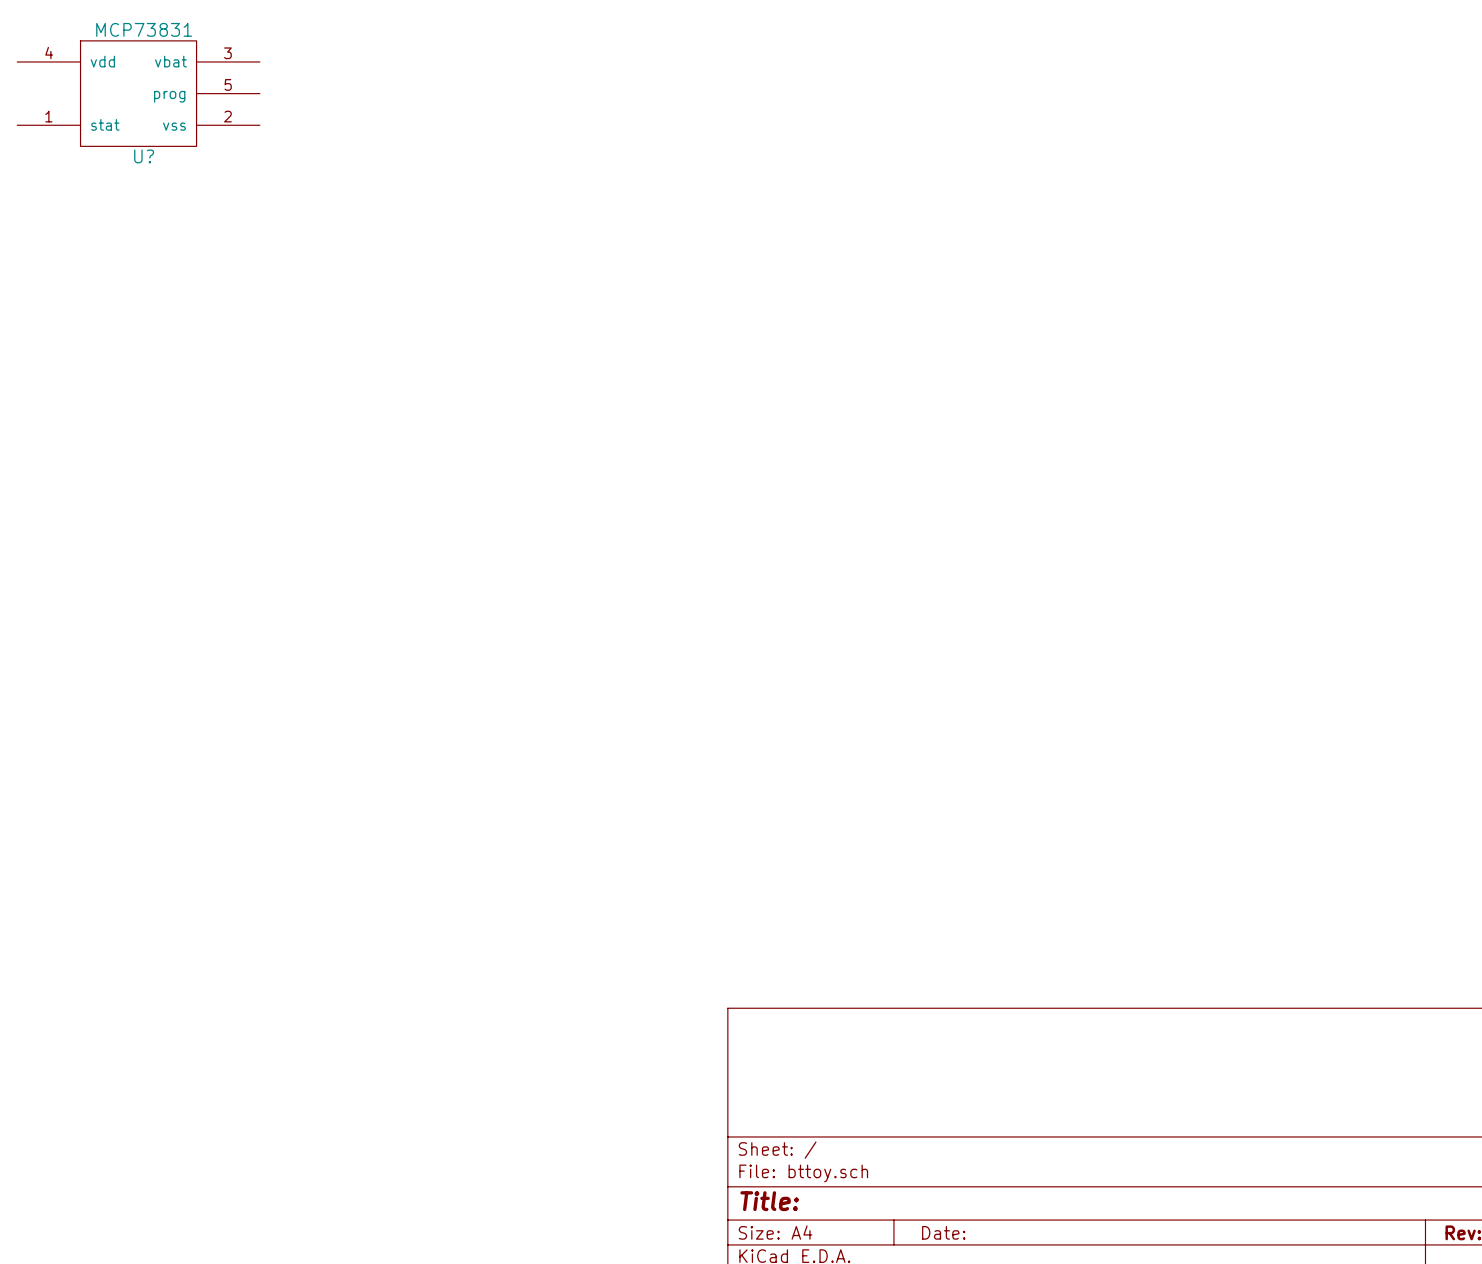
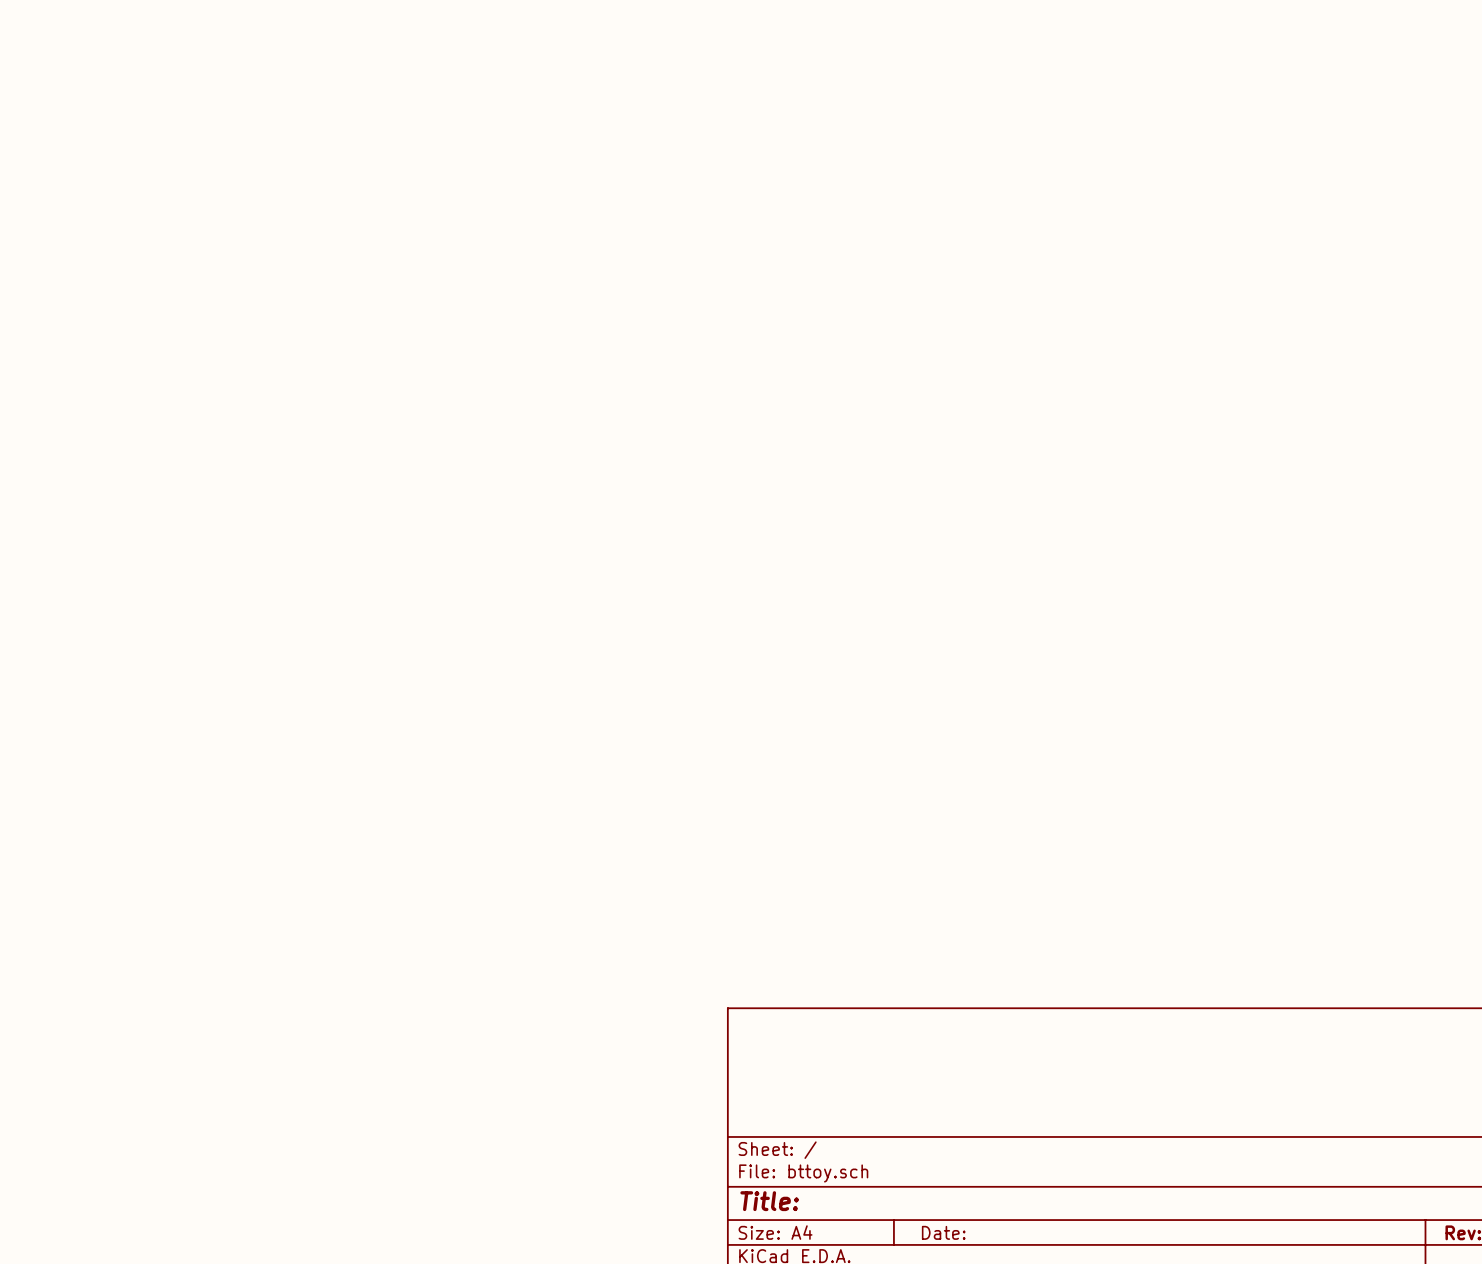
U?: MCP73831 (138, 93) -> none

